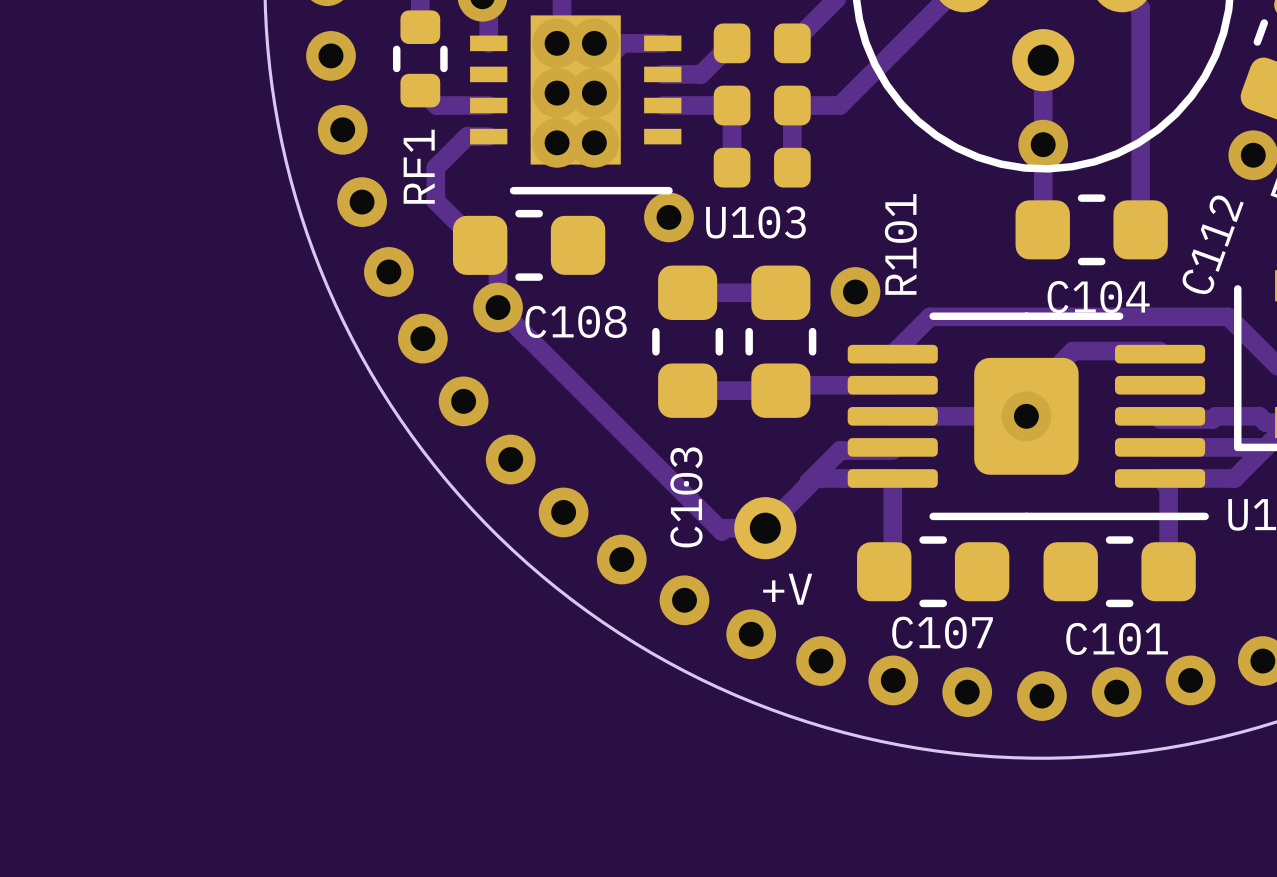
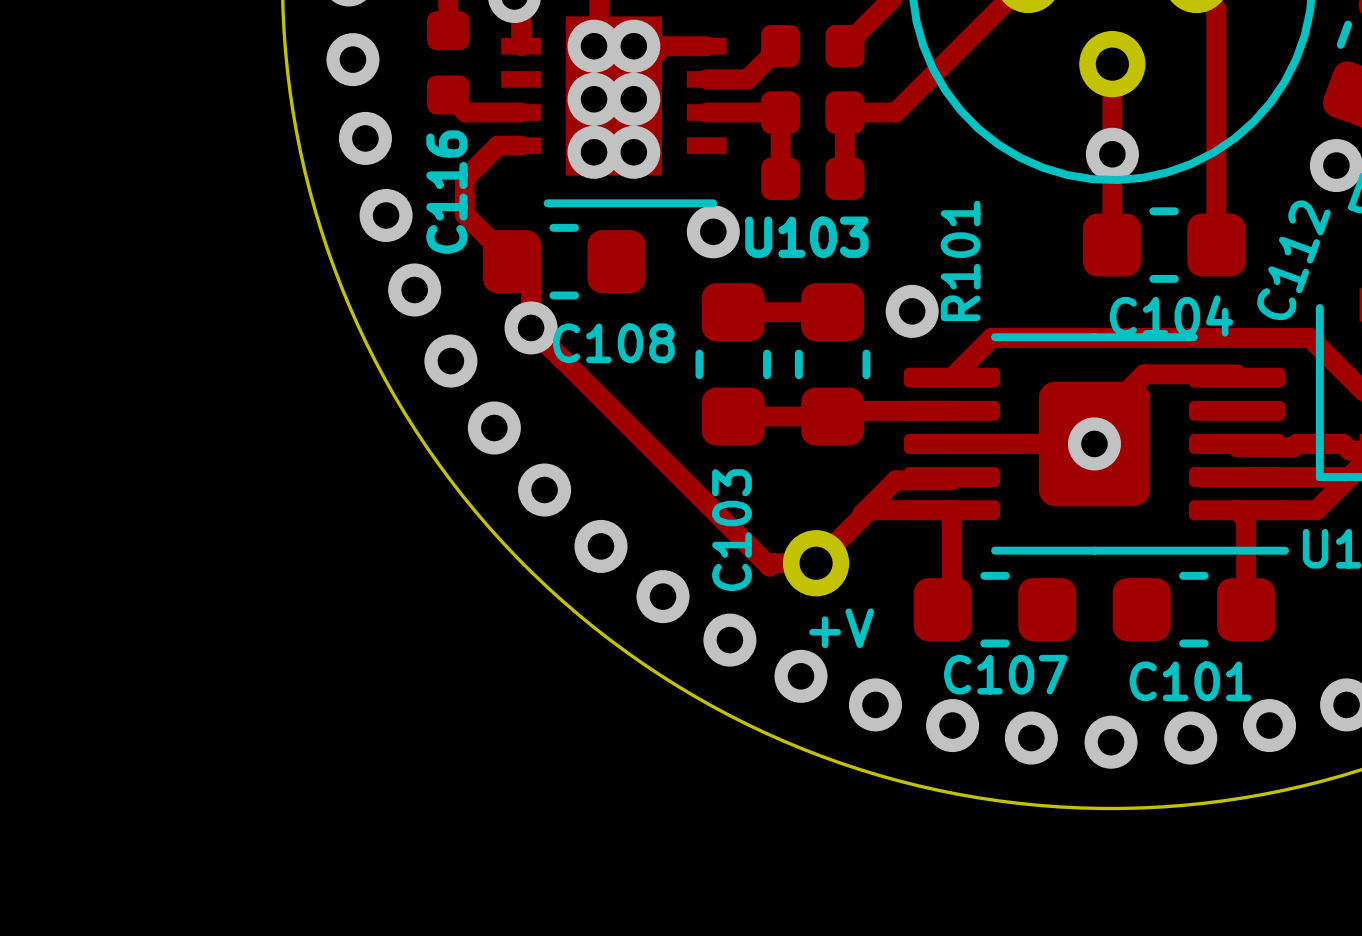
RF1: (420, 58) -> none
C116: none -> (448, 62)

